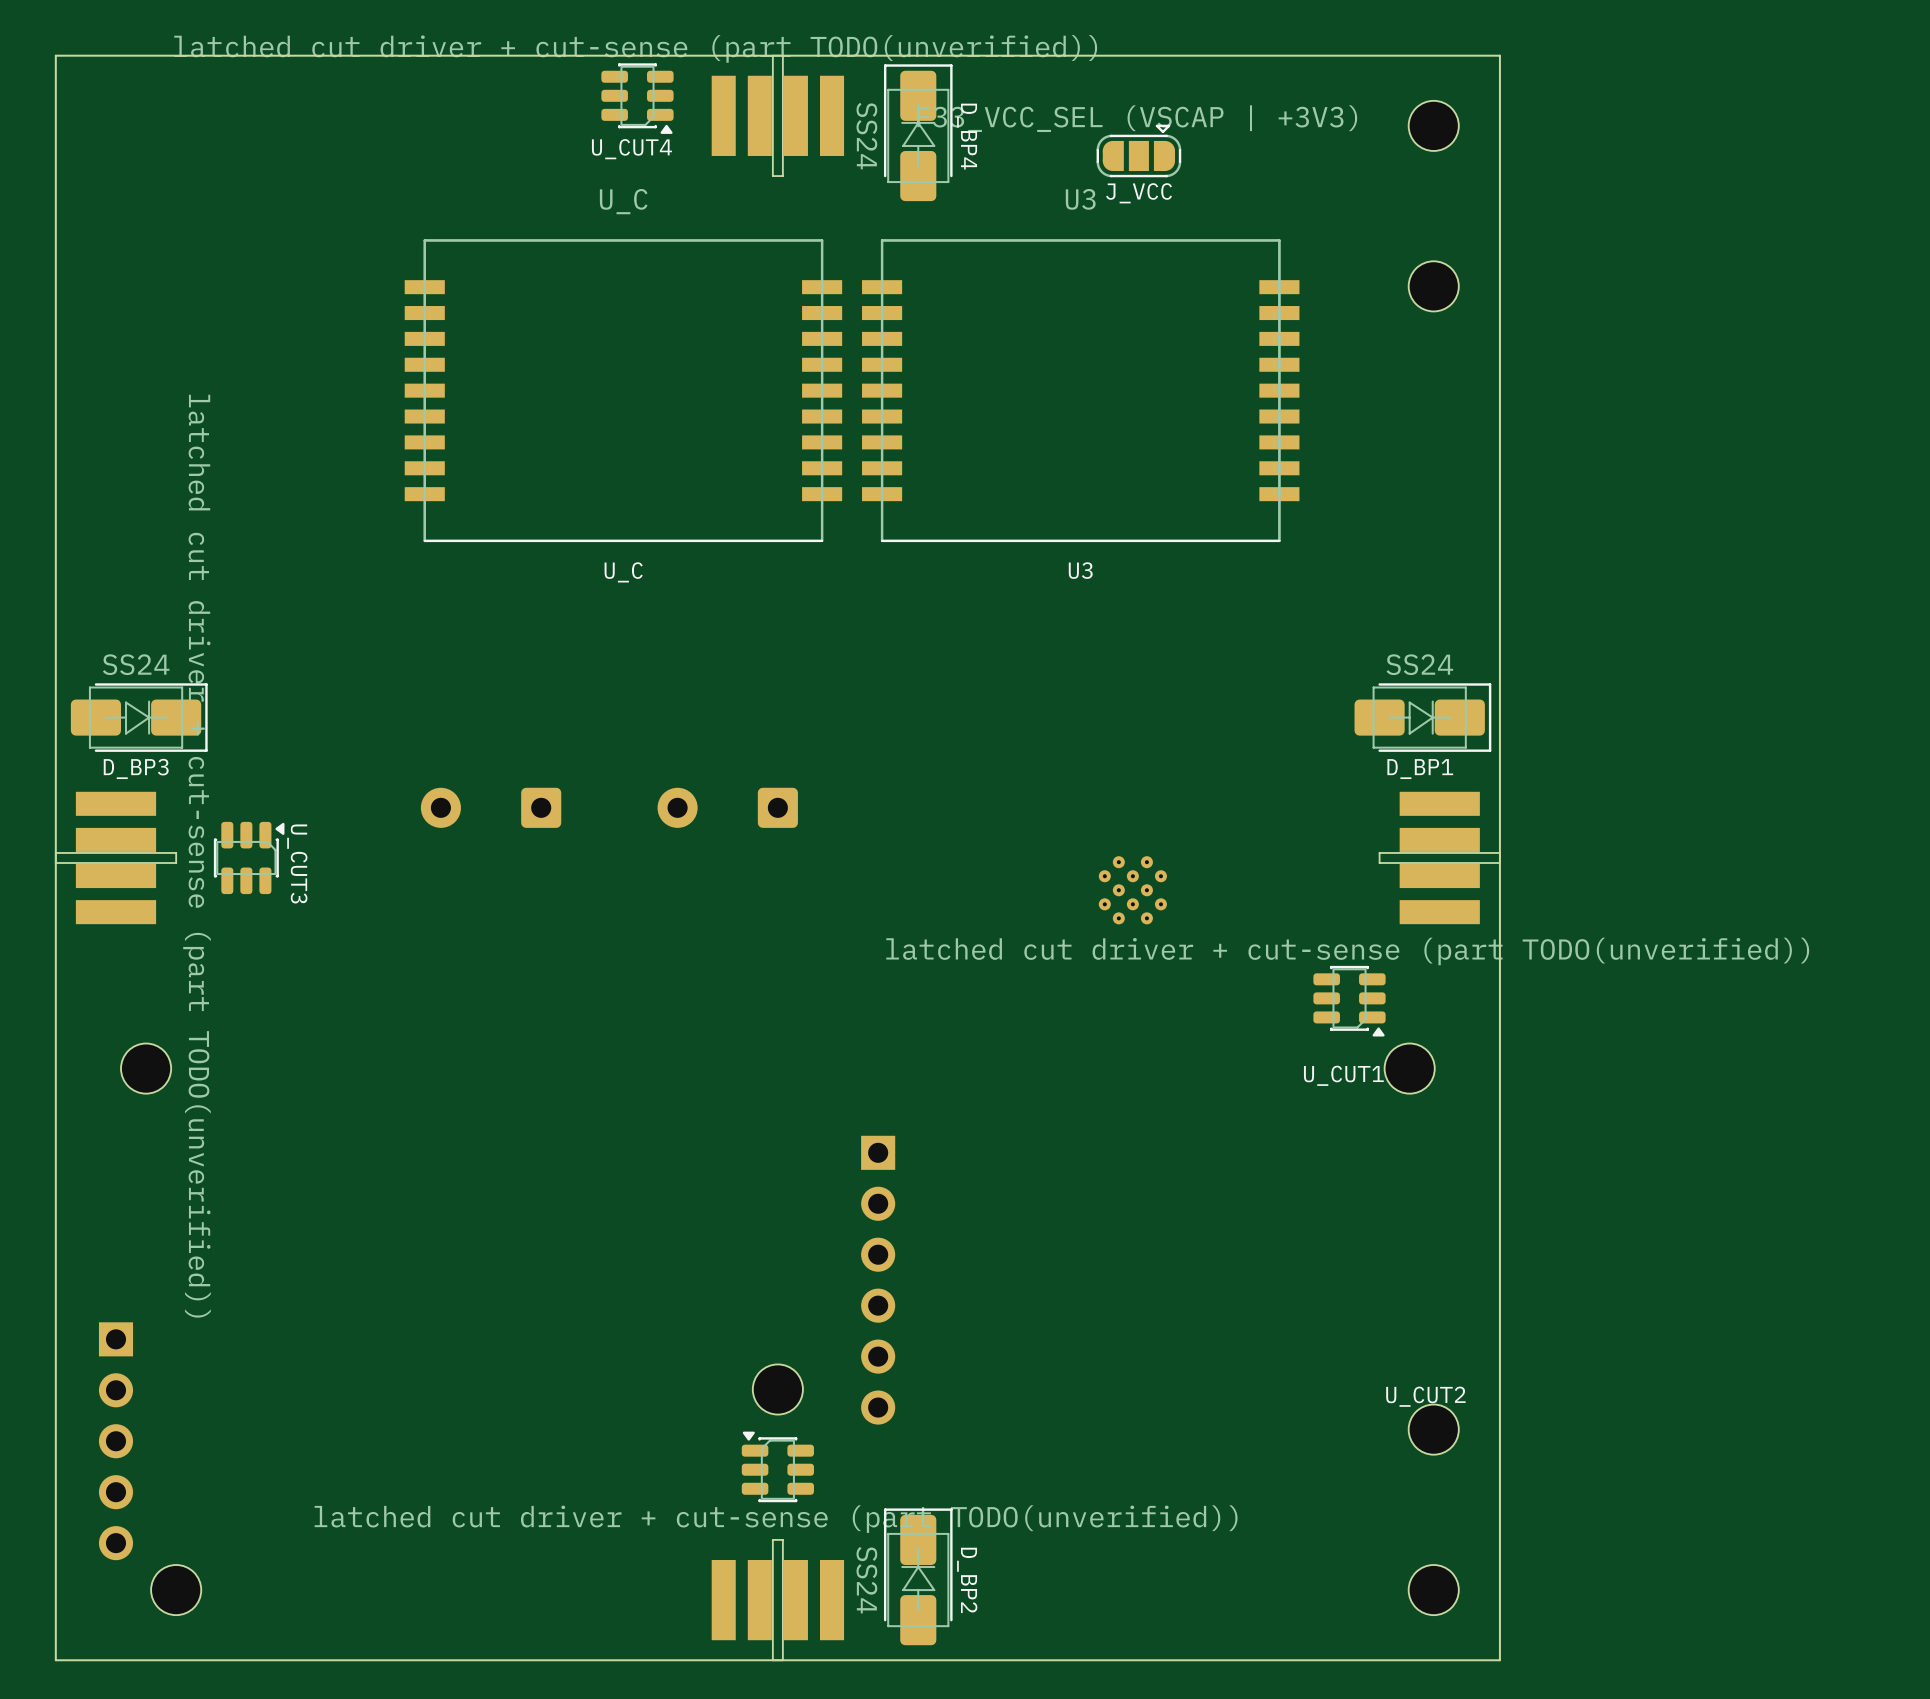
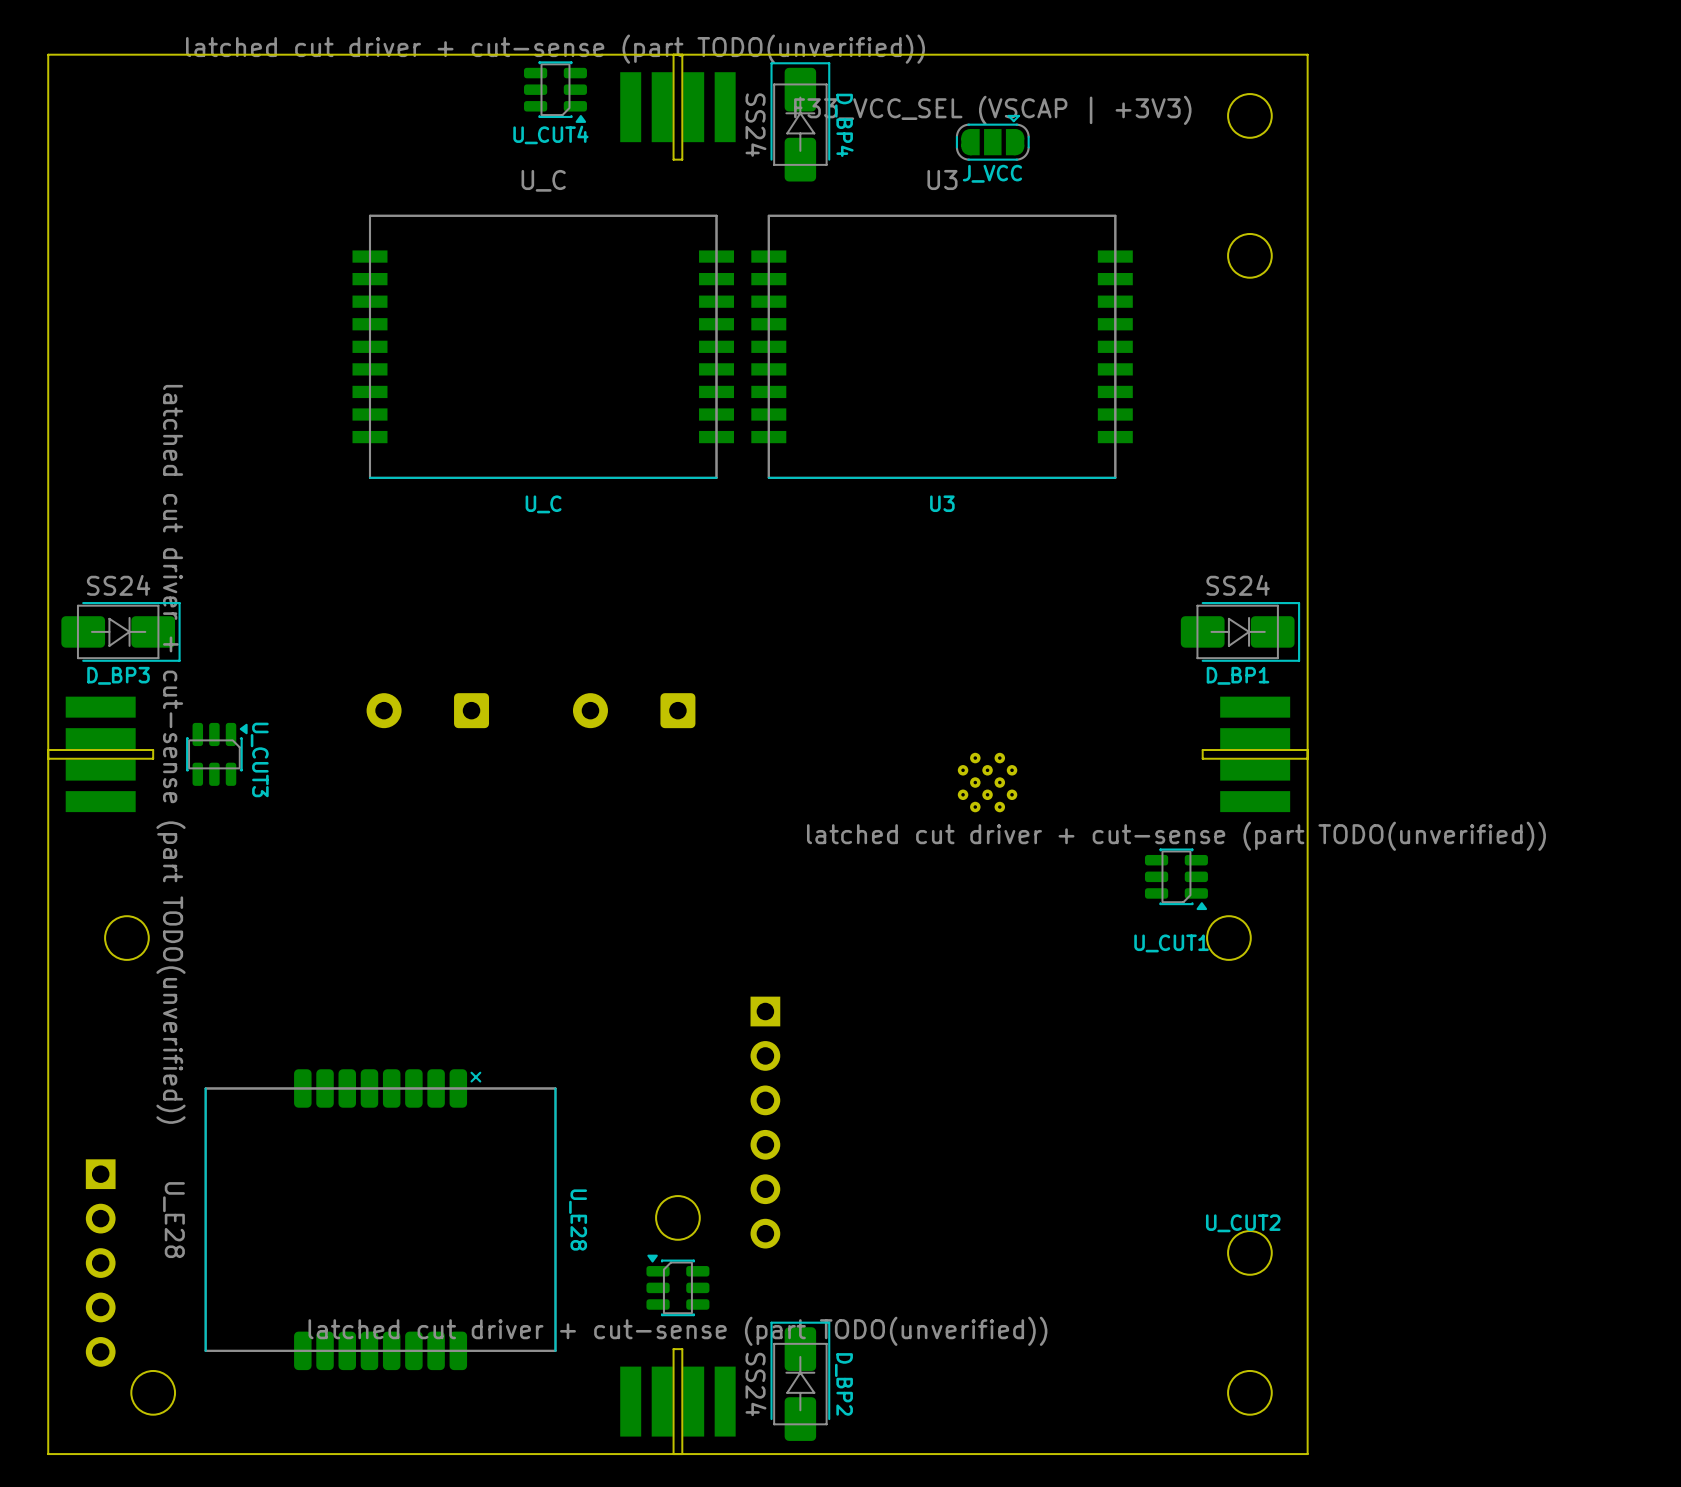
U_E28: none -> U_E28 (380, 1219)

